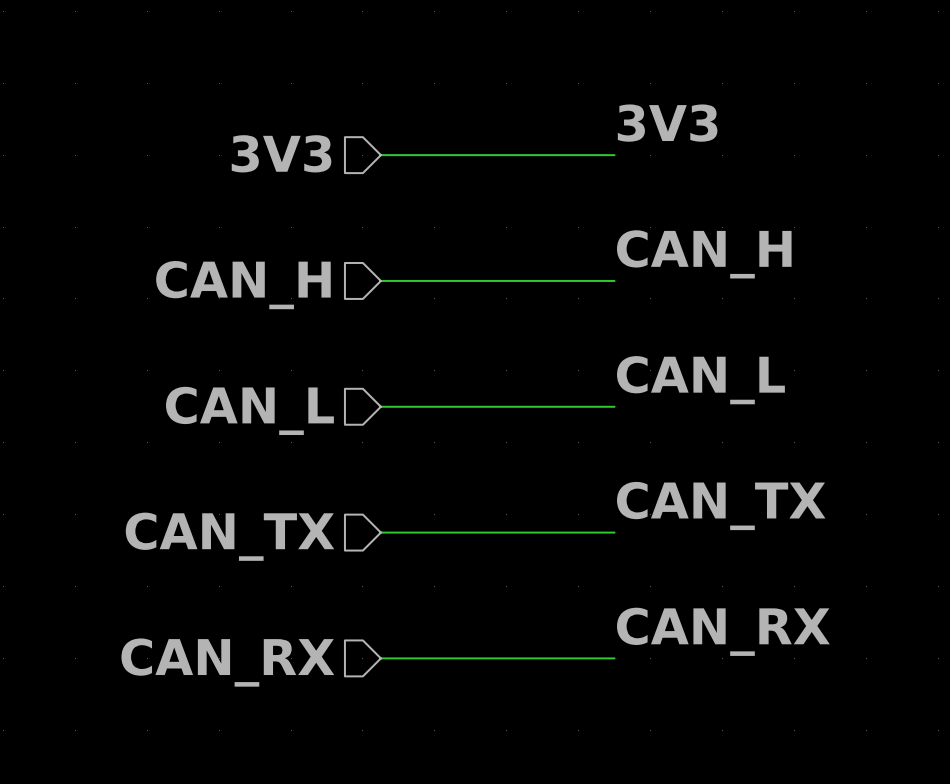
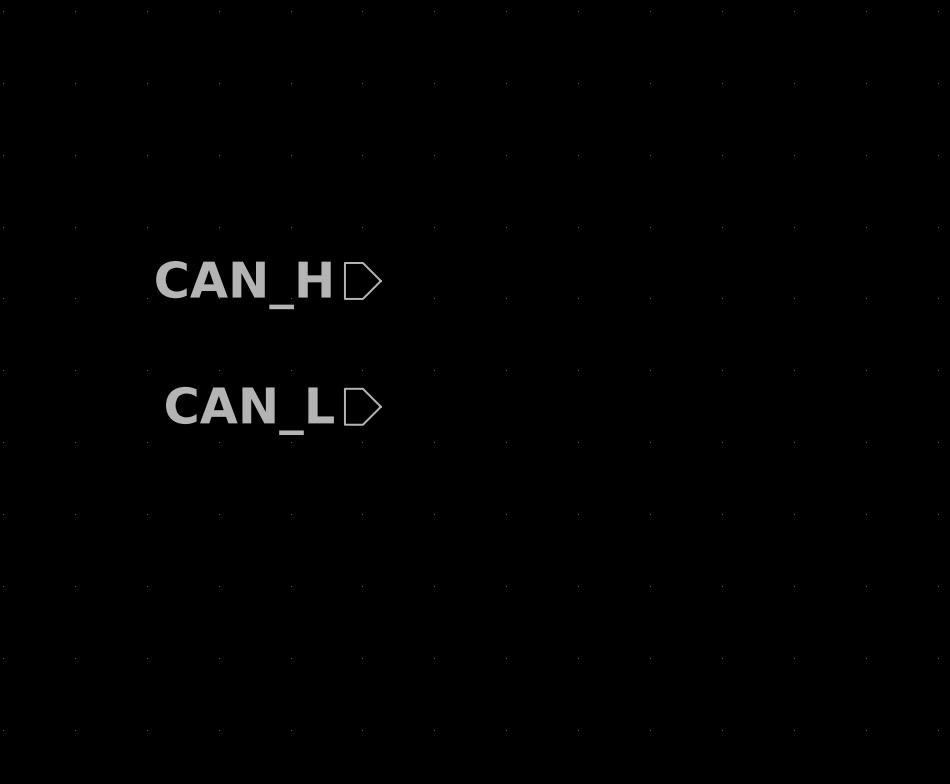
label: 3V3 (667, 123) -> none
hierarchical label: 3V3 (281, 153) -> none
wire: (380, 155) (614, 155) -> none
label: CAN_H (704, 254) -> none
wire: (380, 280) (614, 280) -> none
label: CAN_L (700, 380) -> none
wire: (380, 406) (614, 406) -> none
label: CAN_TX (721, 506) -> none
wire: (380, 532) (614, 532) -> none
hierarchical label: CAN_TX (230, 536) -> none
label: CAN_RX (723, 631) -> none
wire: (380, 658) (614, 658) -> none
hierarchical label: CAN_RX (227, 662) -> none

